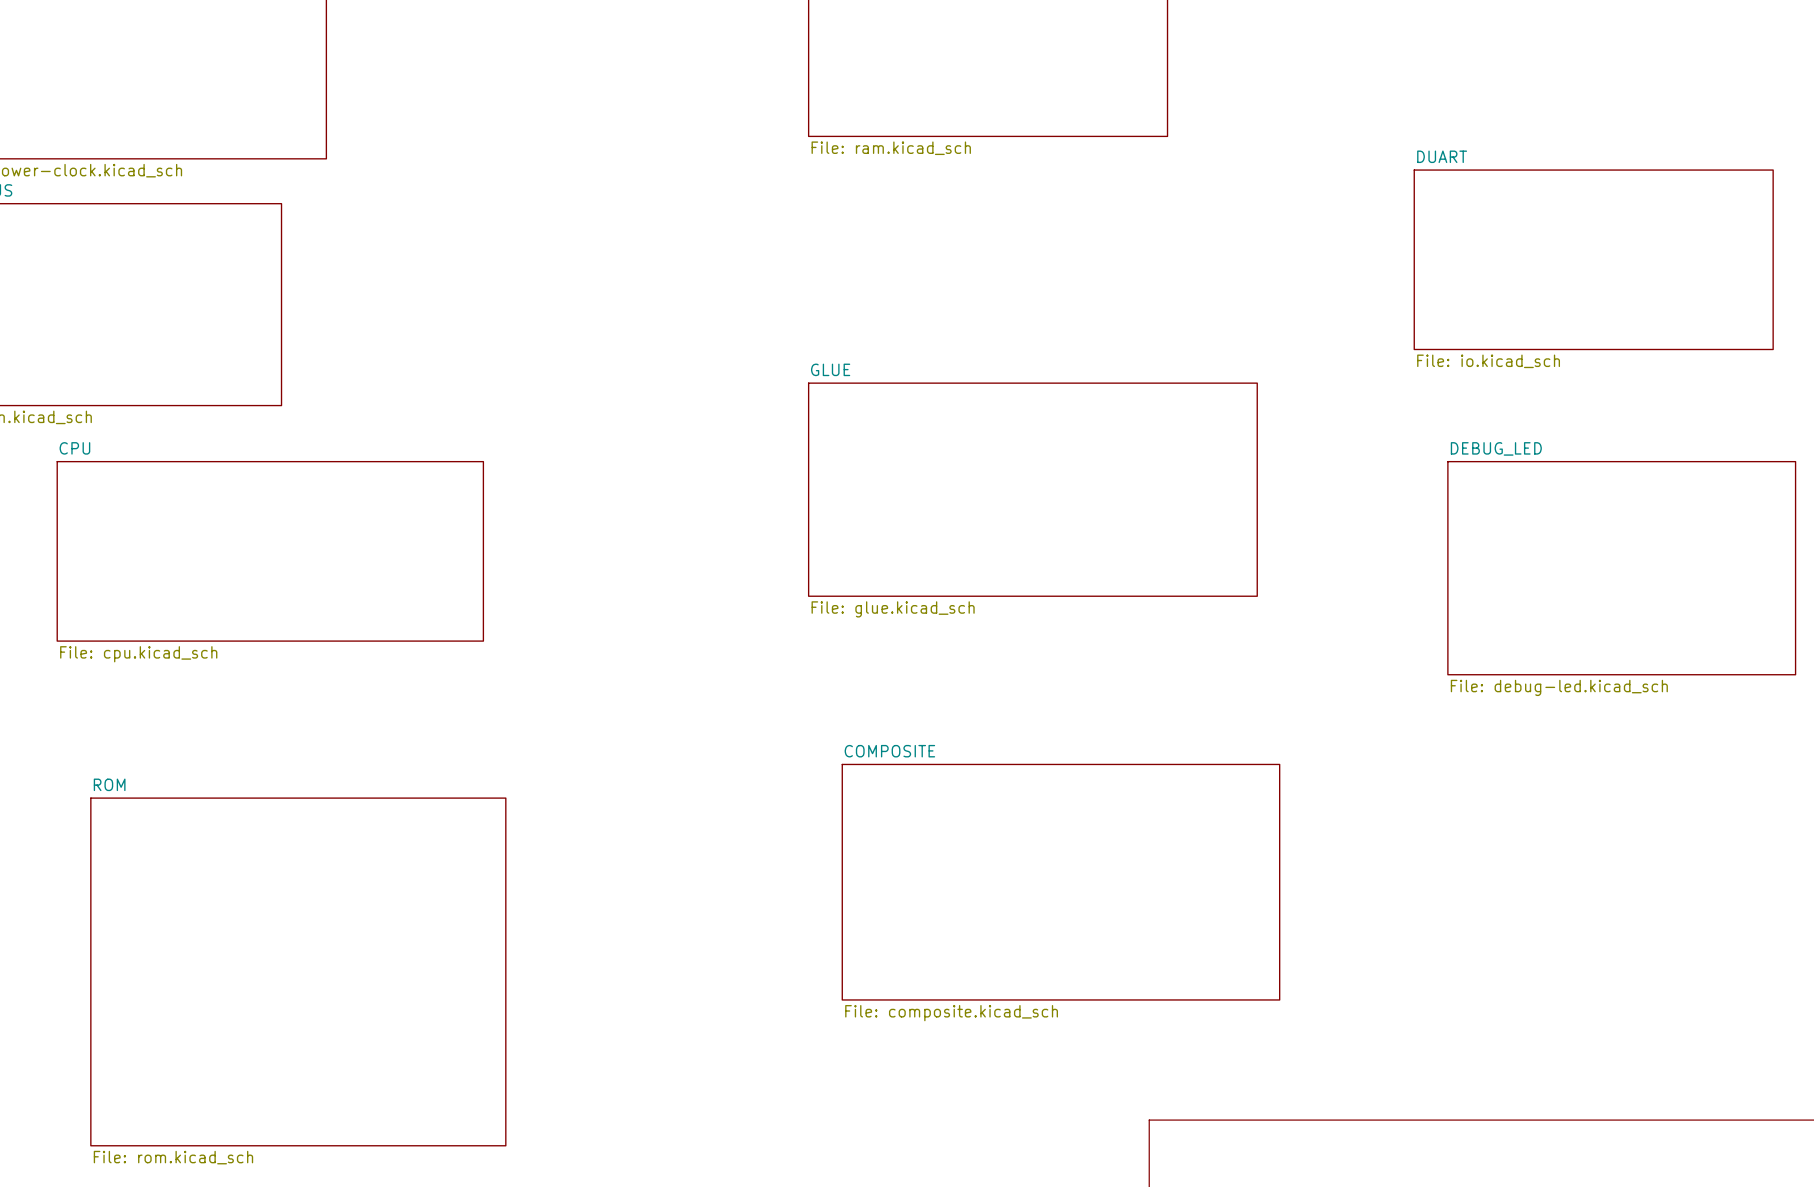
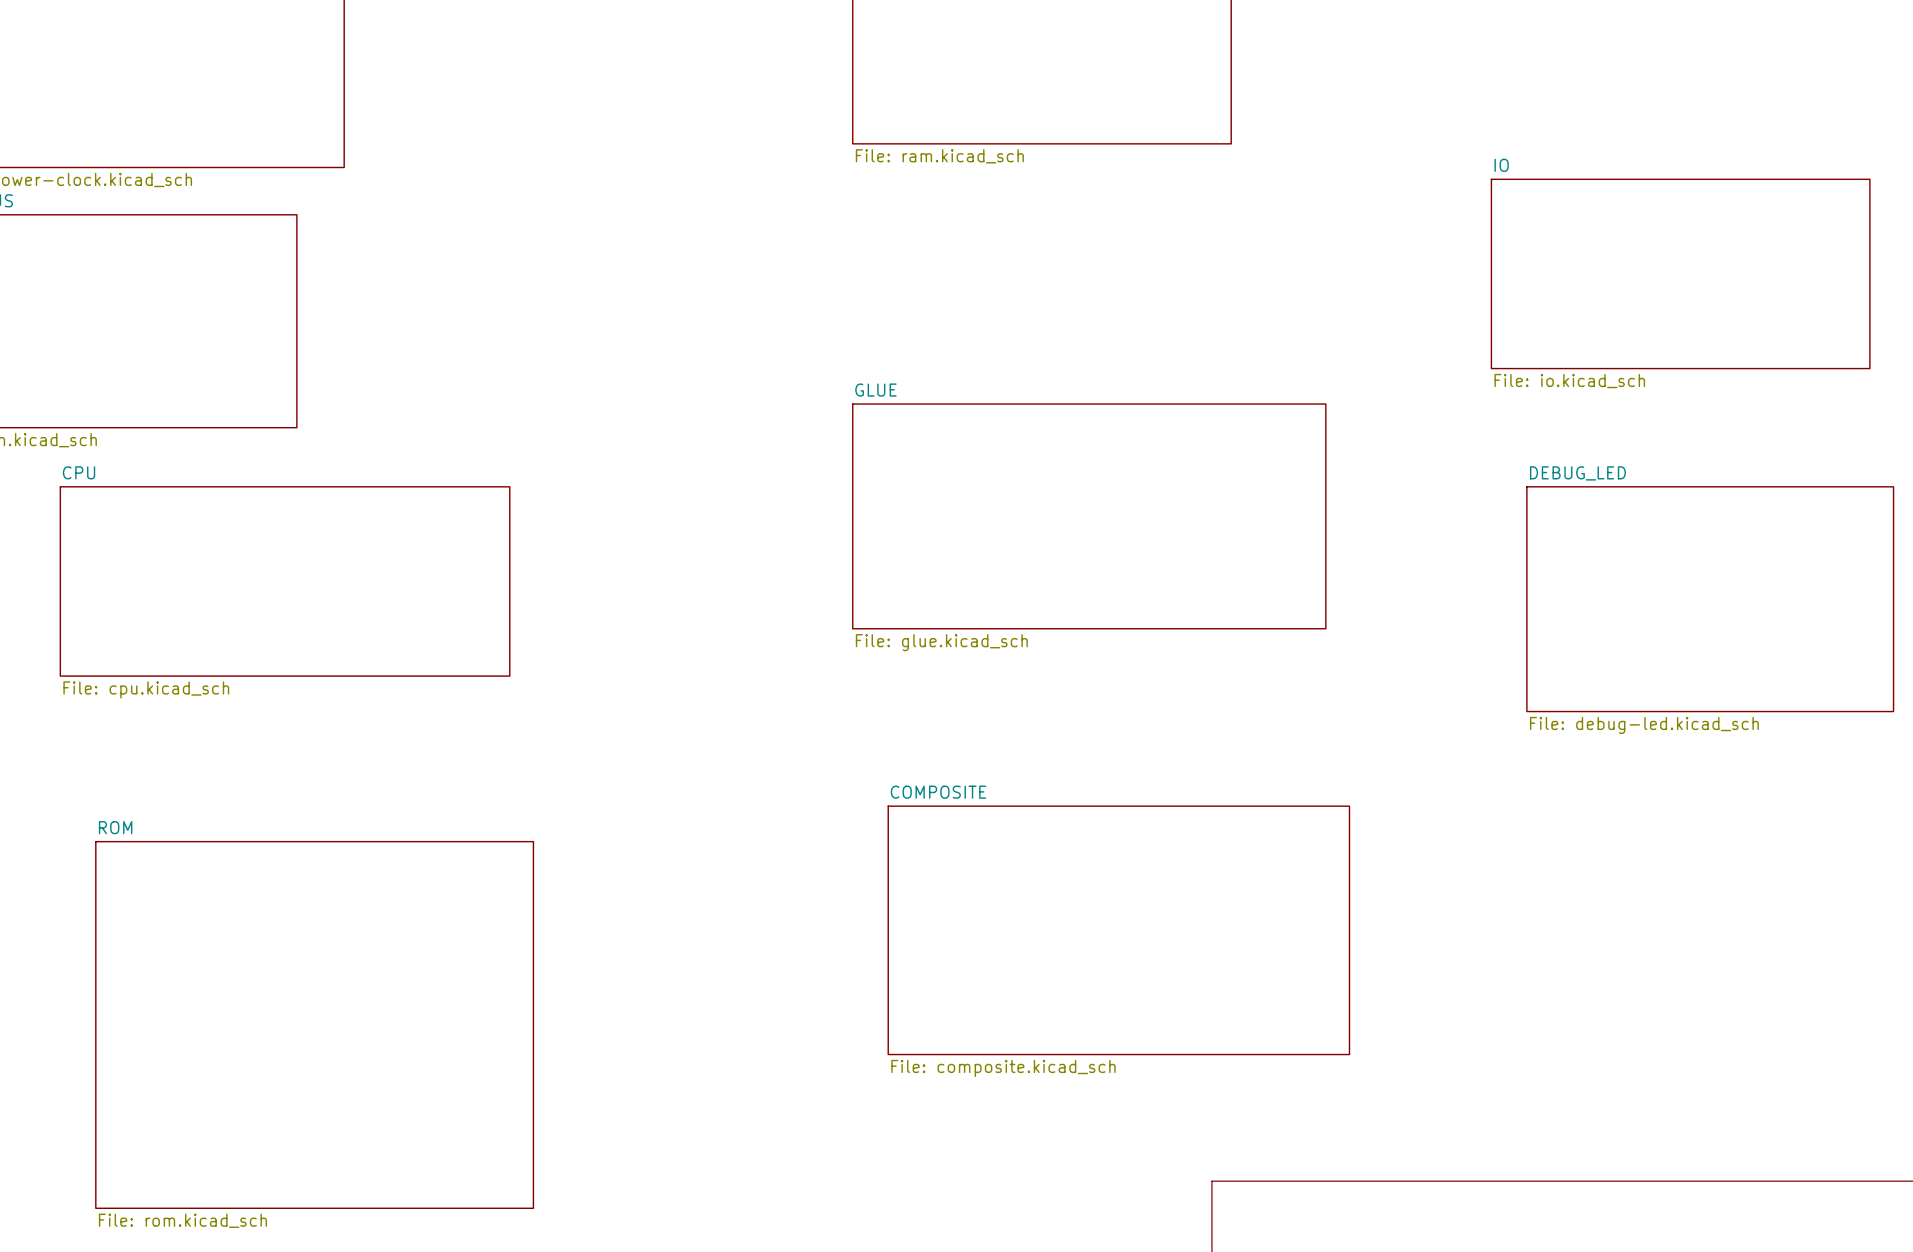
sheet DUART name: DUART (1442, 156) -> IO (1501, 165)

